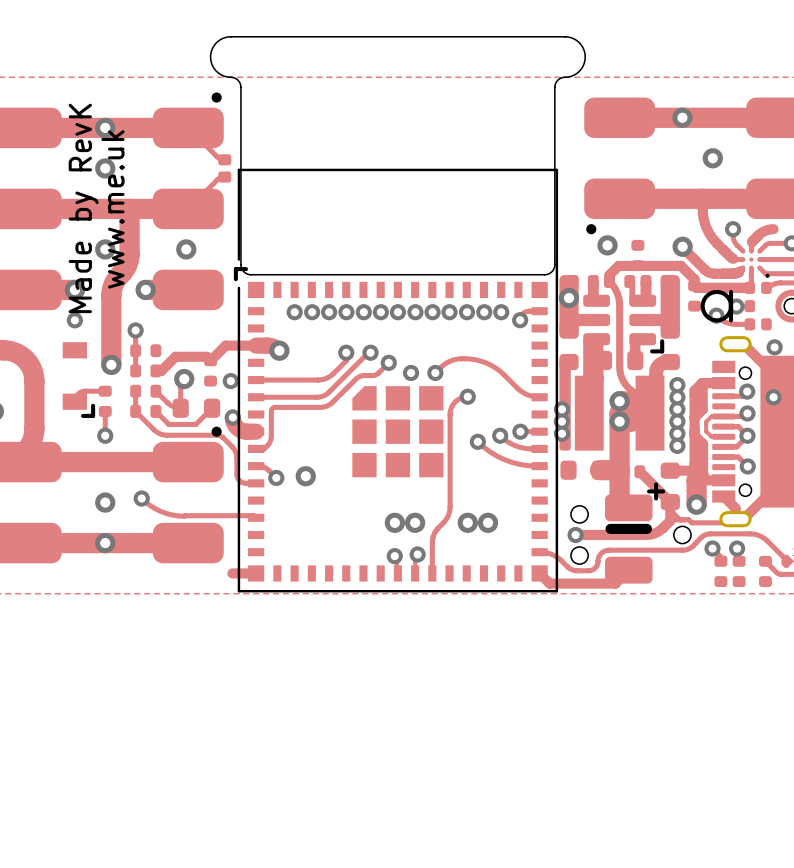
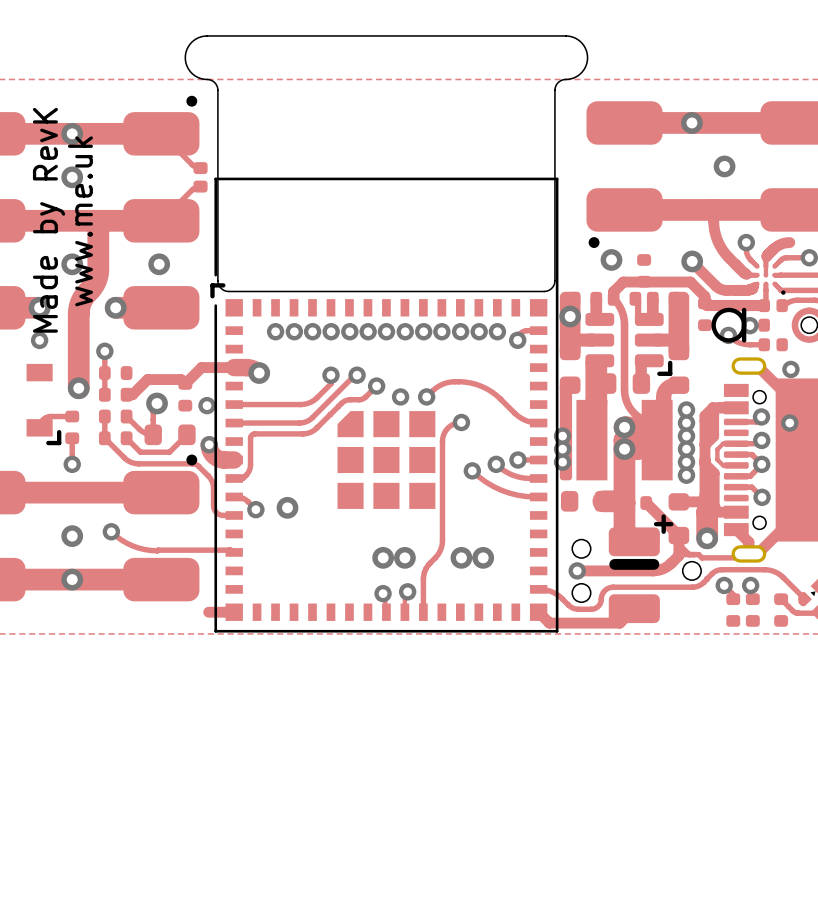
track: none -> (765, 266) (765, 275)

